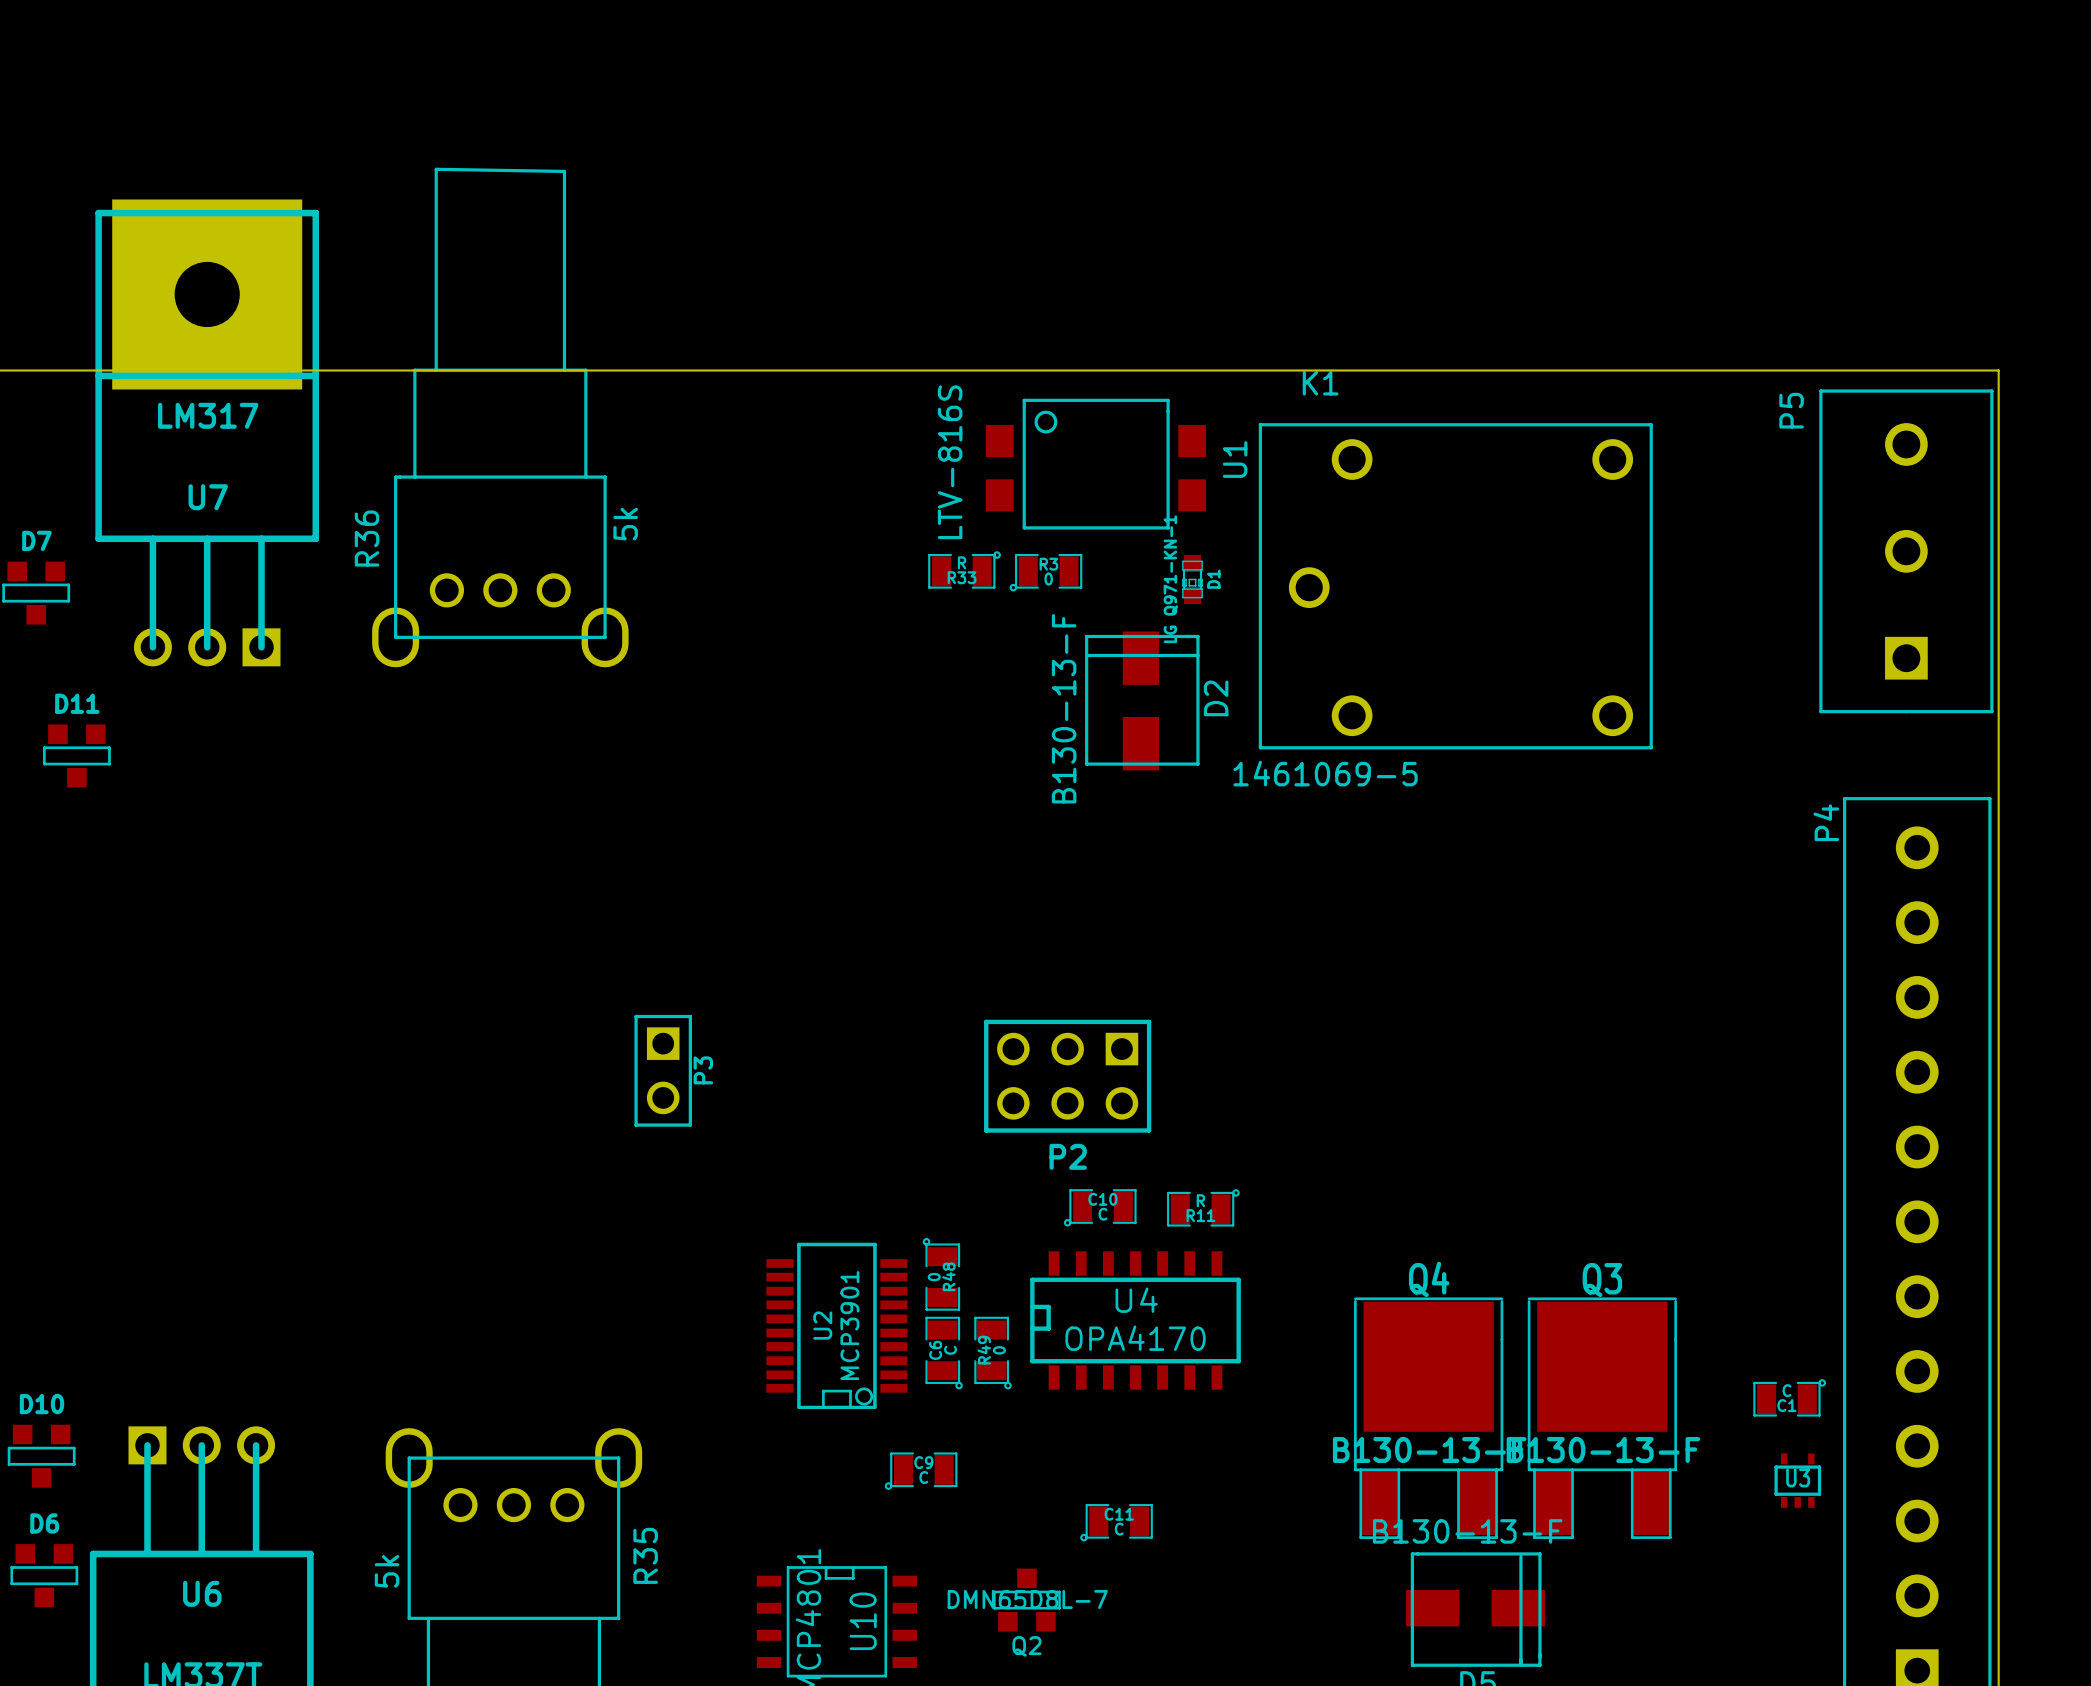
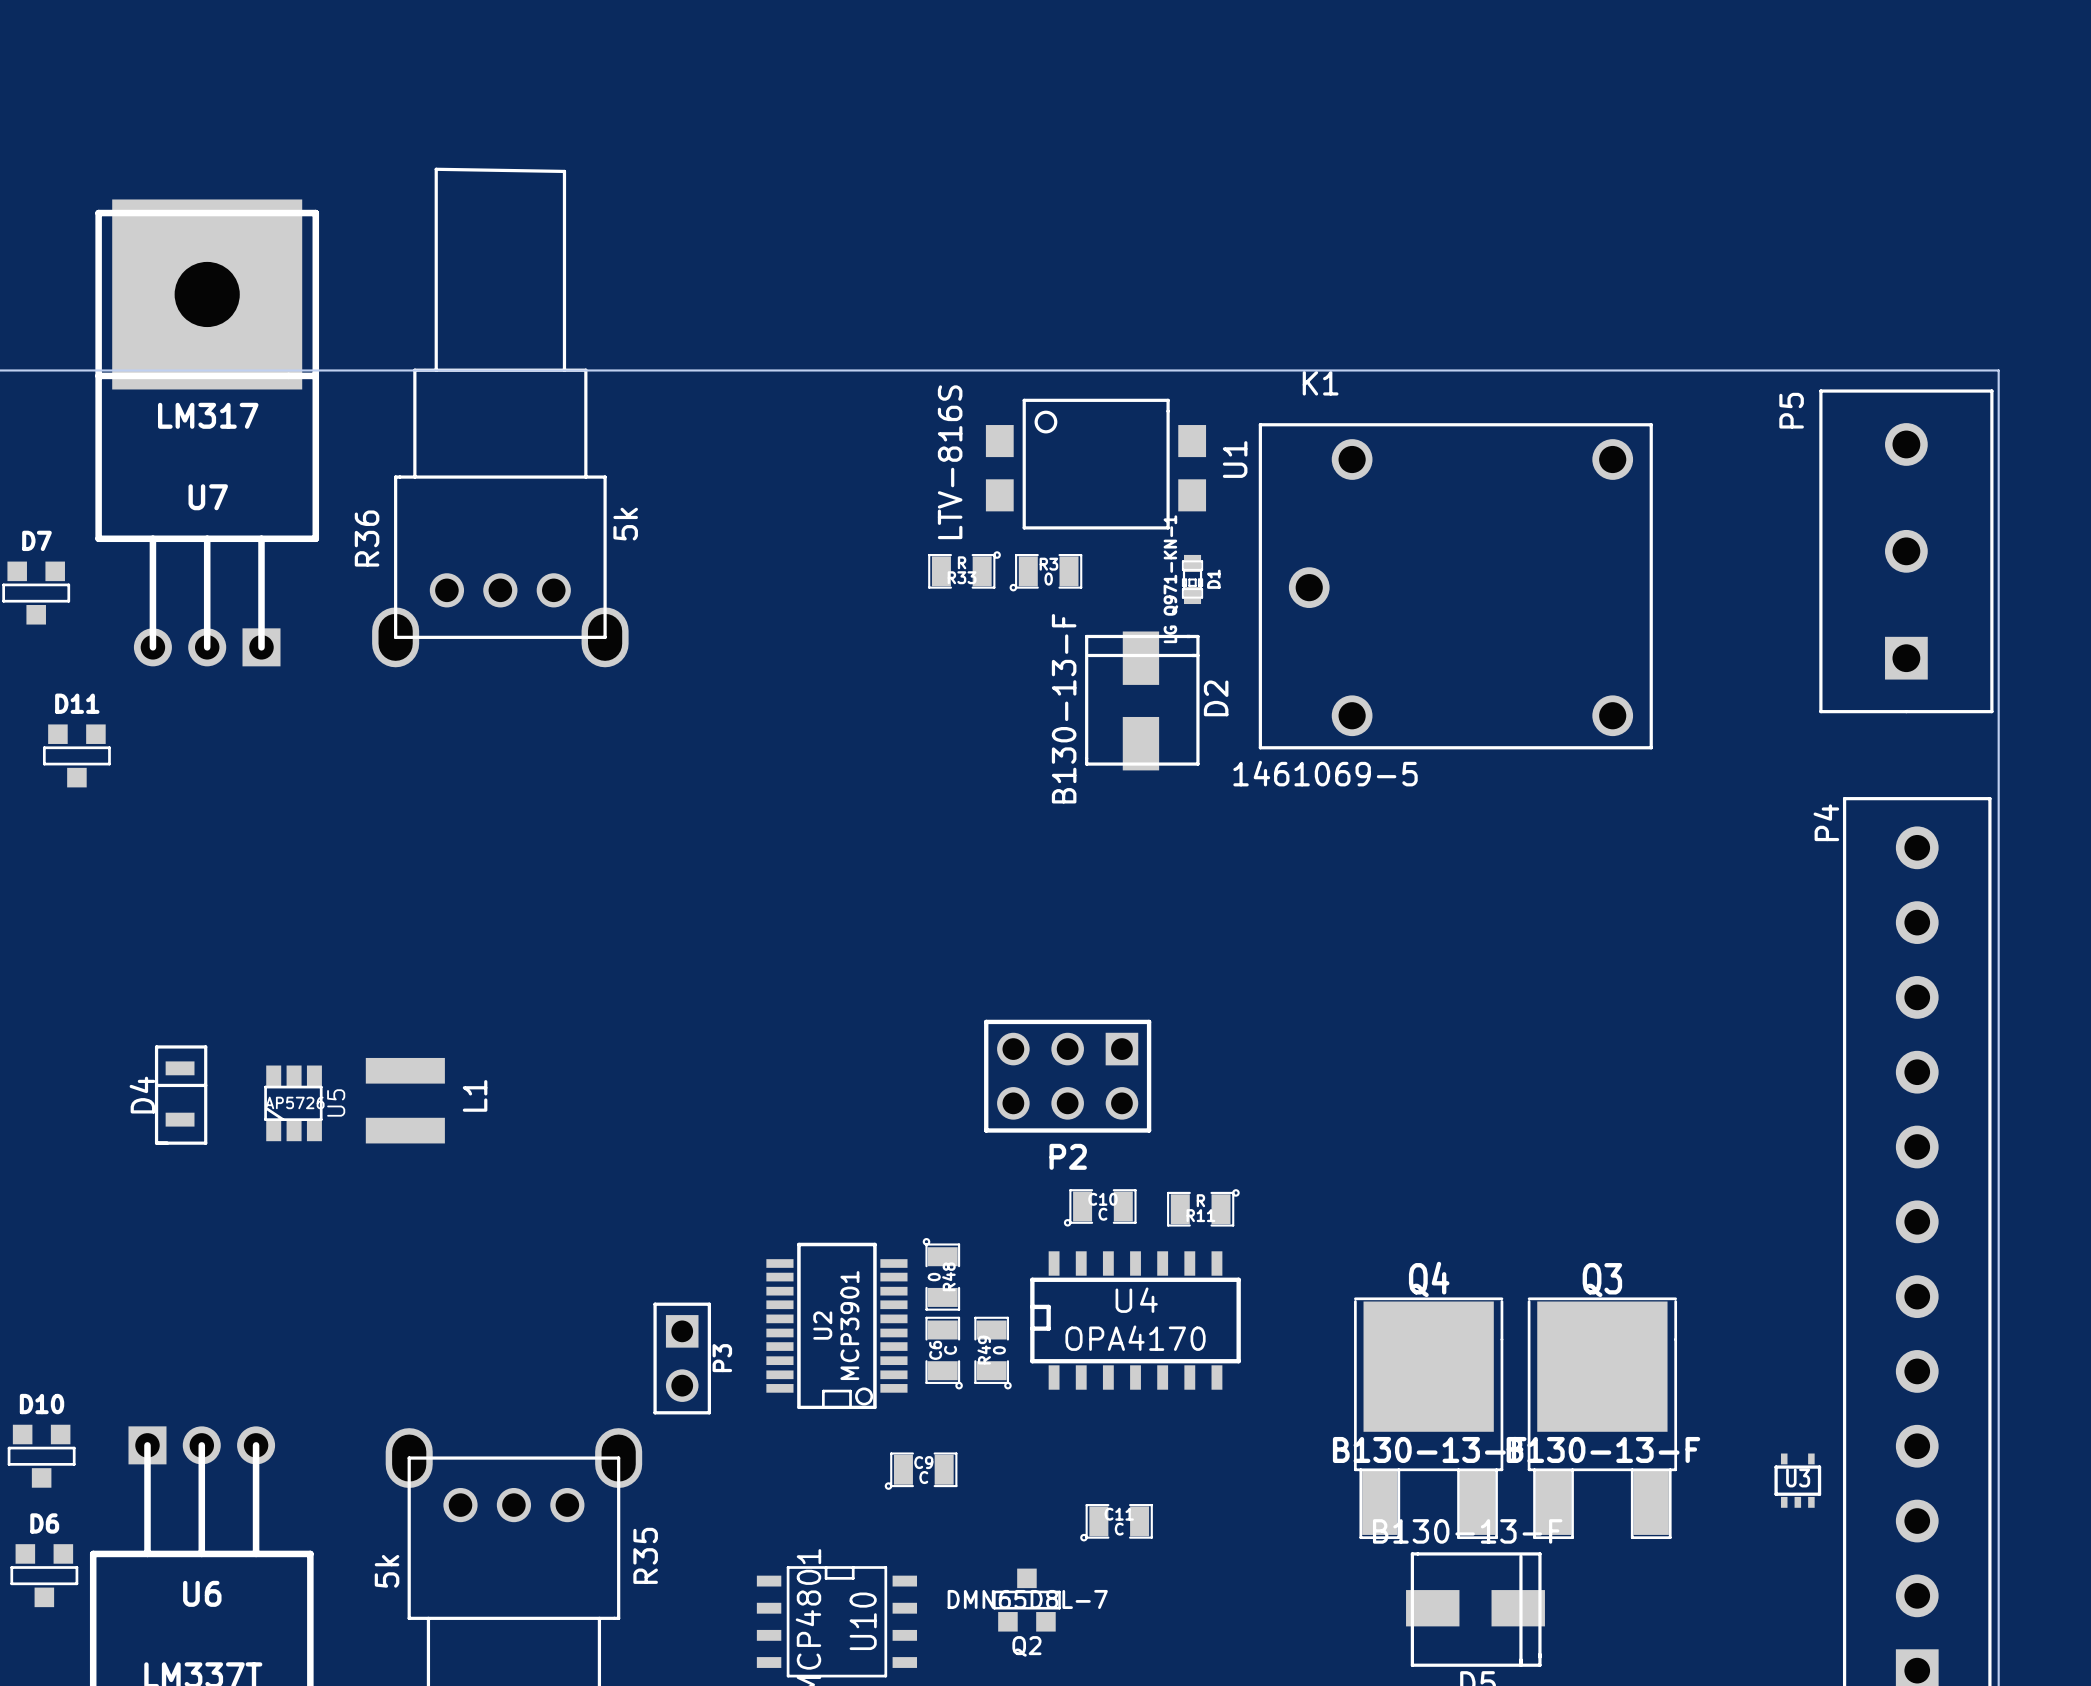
P3 position: (663, 1070) -> (682, 1358)
D4: none -> (181, 1095)
L1: none -> (405, 1100)
U5: none -> AP5726 (293, 1103)
C1: C (1789, 1397) -> none

